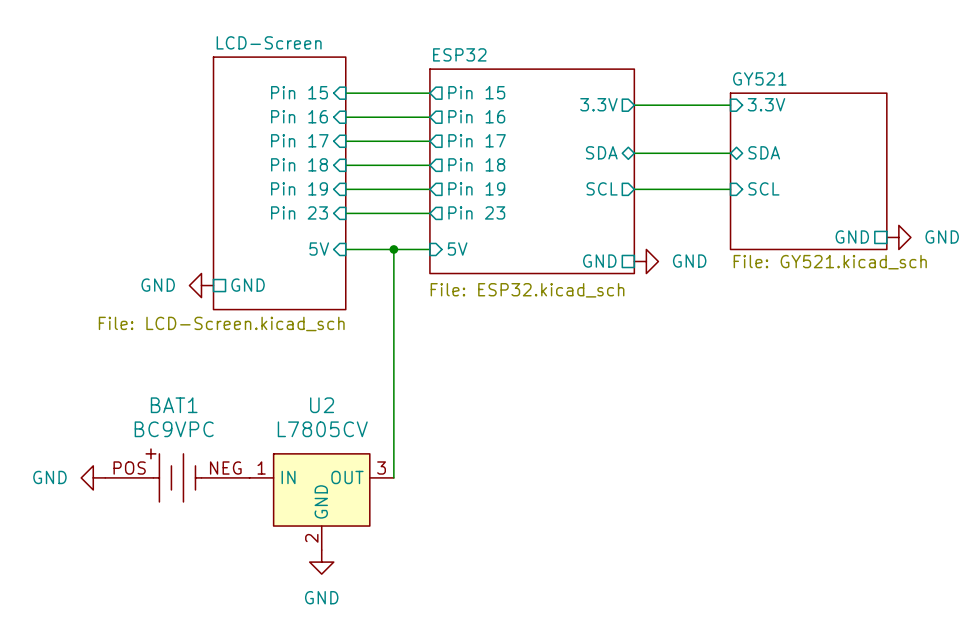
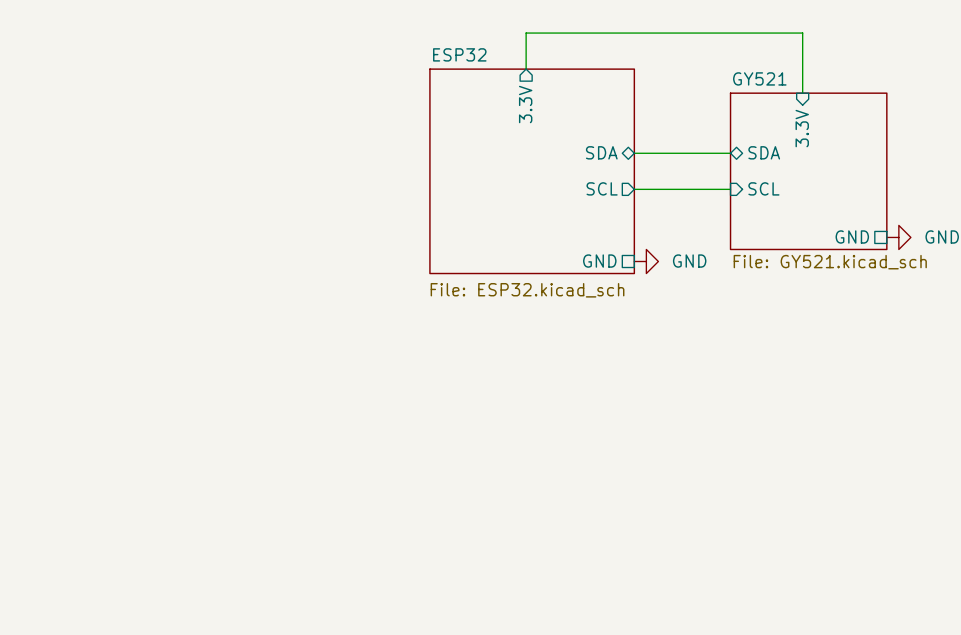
wire: none -> (526, 69) (526, 33) (802, 33) (802, 93)
sheet pin: Pin 15 (299, 92) -> none
sheet pin: Pin 15 (476, 92) -> none
wire: (345, 93) (429, 93) -> none
sheet pin: none -> 3.3V (525, 104)
sheet pin: 3.3V (598, 104) -> none
sheet pin rotation: 0° (766, 104) -> 90° clockwise (802, 128)
wire: (634, 105) (730, 105) -> none
sheet pin: Pin 16 (299, 116) -> none
sheet pin: Pin 16 (476, 116) -> none
wire: (345, 117) (429, 117) -> none
sheet pin: Pin 17 (299, 140) -> none
sheet pin: Pin 17 (477, 140) -> none
wire: (345, 141) (429, 141) -> none
sheet pin: Pin 18 (299, 164) -> none
sheet pin: Pin 18 (476, 164) -> none
wire: (345, 165) (429, 165) -> none
sheet LCD-Screen: File: LCD-Screen.kicad_sch (279, 183) -> none
sheet pin: Pin 19 (299, 188) -> none
sheet pin: Pin 19 (476, 188) -> none
wire: (345, 189) (429, 189) -> none
sheet pin: Pin 23 (299, 212) -> none
sheet pin: Pin 23 (476, 212) -> none
wire: (345, 213) (429, 213) -> none
sheet pin: 5V (319, 249) -> none
wire: (345, 249) (429, 249) -> none
wire: (393, 249) (393, 477) -> none
junction: (393, 249) -> none
sheet pin: 5V (457, 249) -> none
power symbol: GND (201, 285) -> none
sheet pin: GND (248, 285) -> none
BAT1: BC9VPC (177, 475) -> none
power symbol: GND (93, 477) -> none
U2: L7805CV (321, 501) -> none
power symbol: GND (321, 562) -> none

